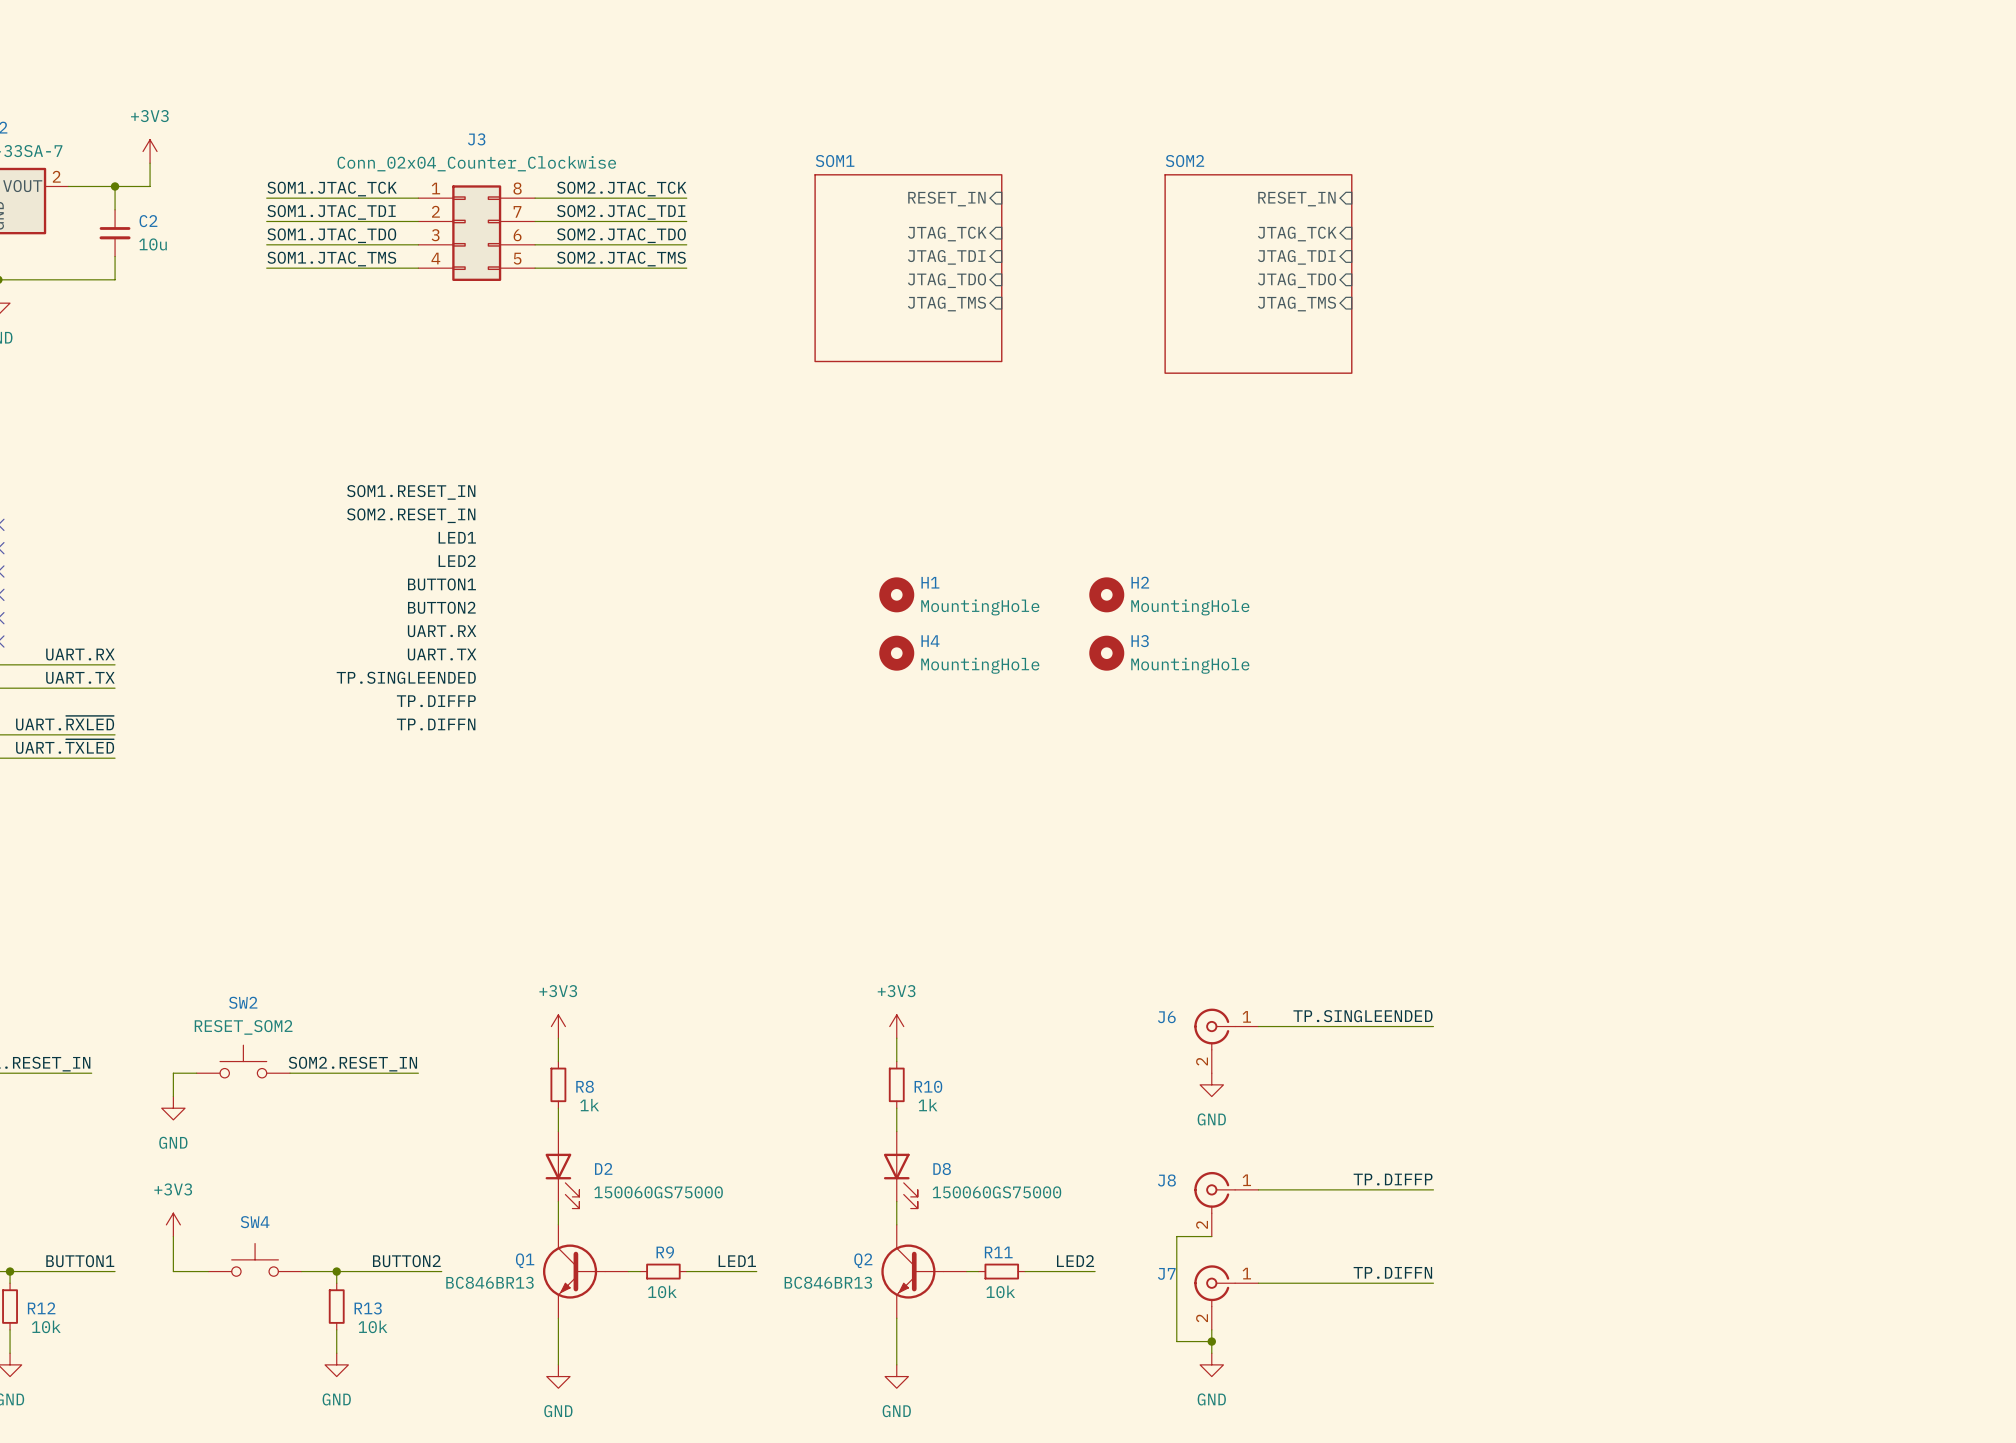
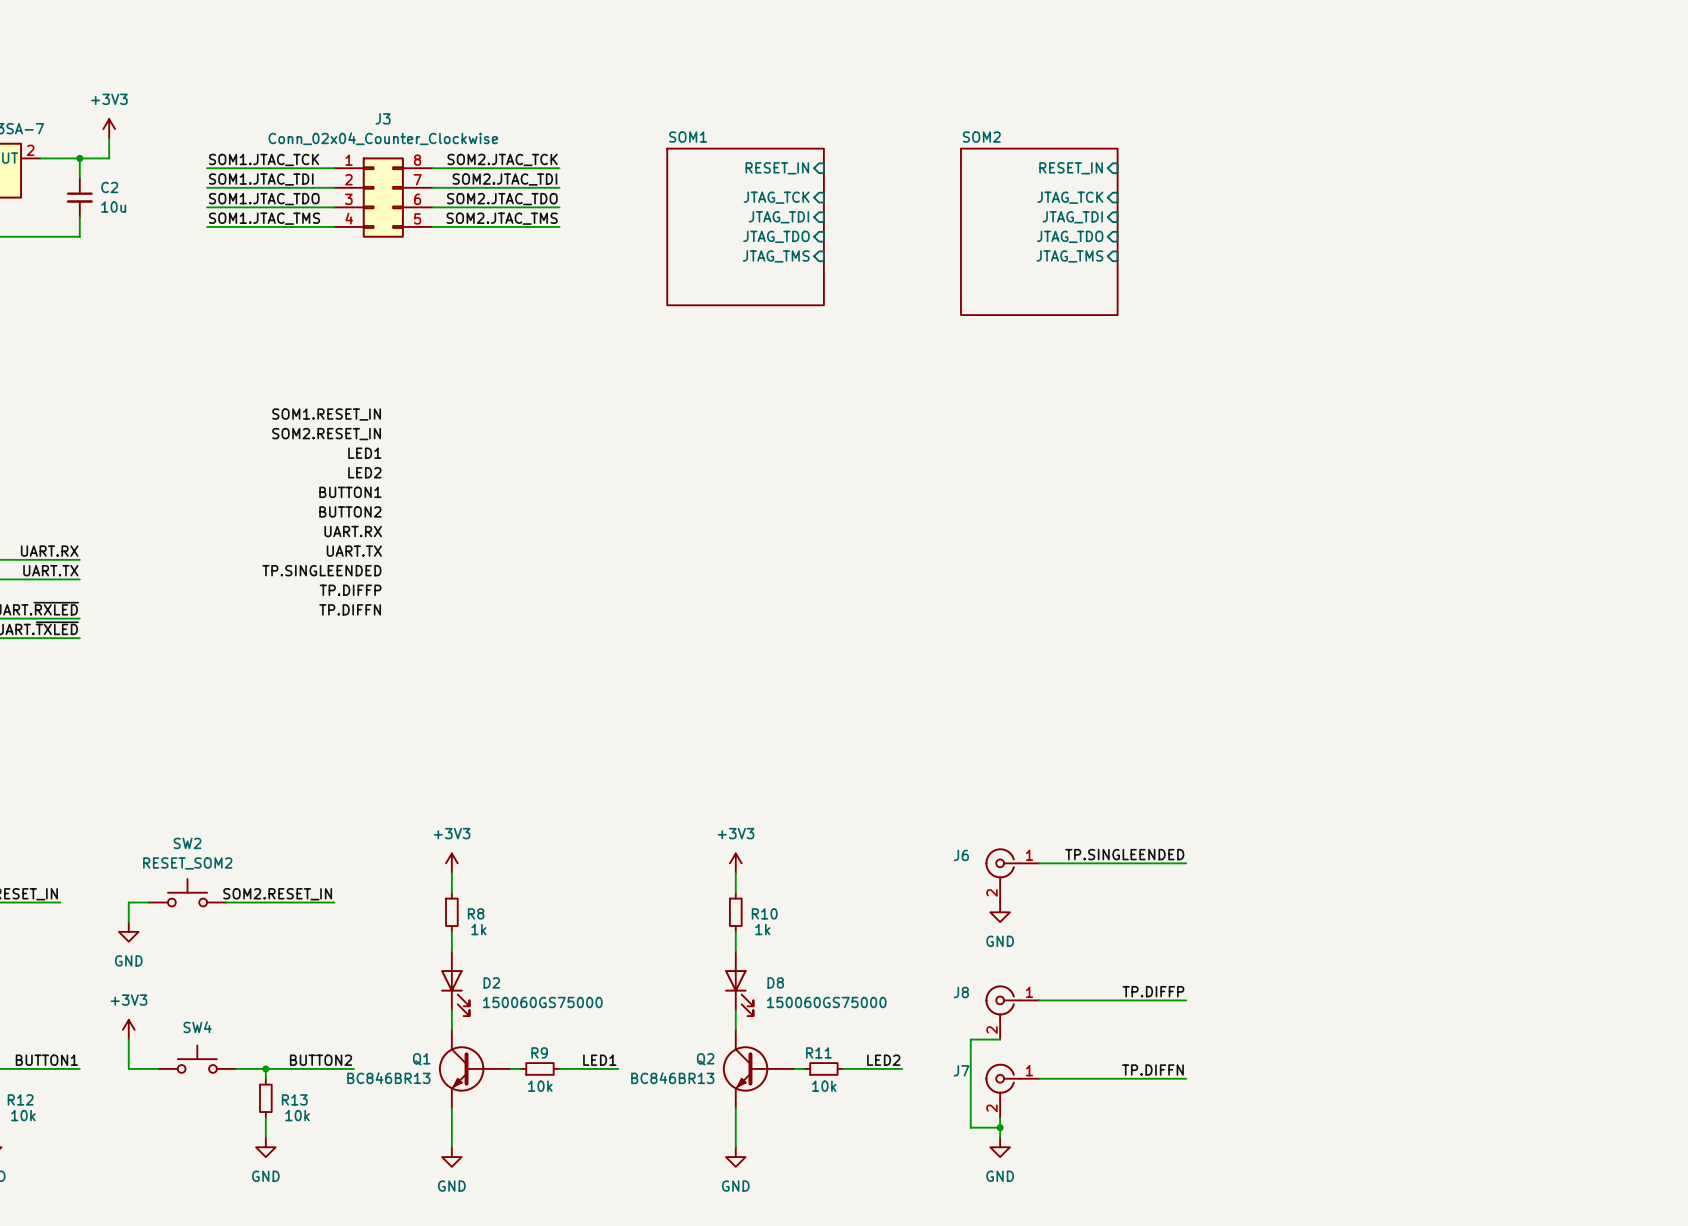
H1: MountingHole (896, 594) -> none
H2: MountingHole (1106, 594) -> none
H4: MountingHole (896, 653) -> none
H3: MountingHole (1106, 653) -> none

